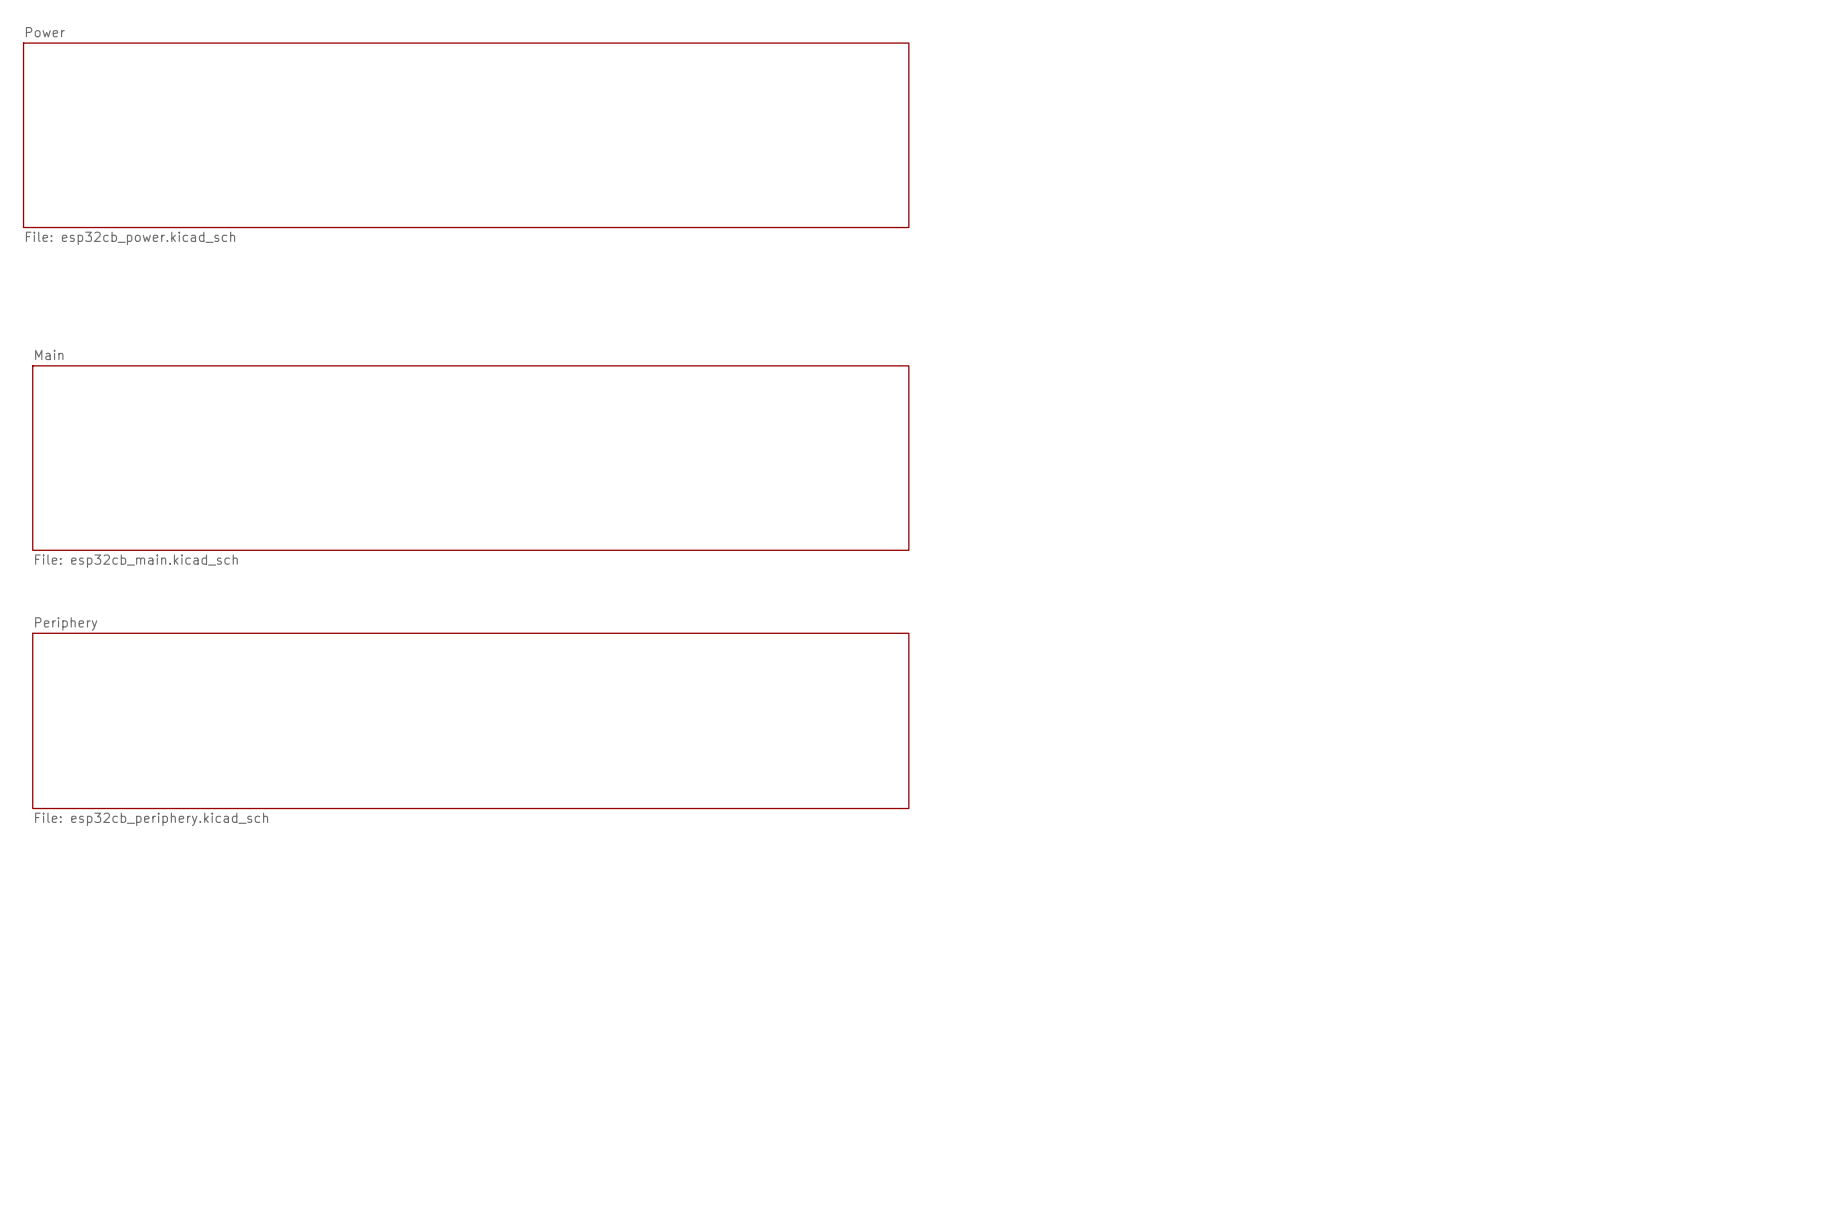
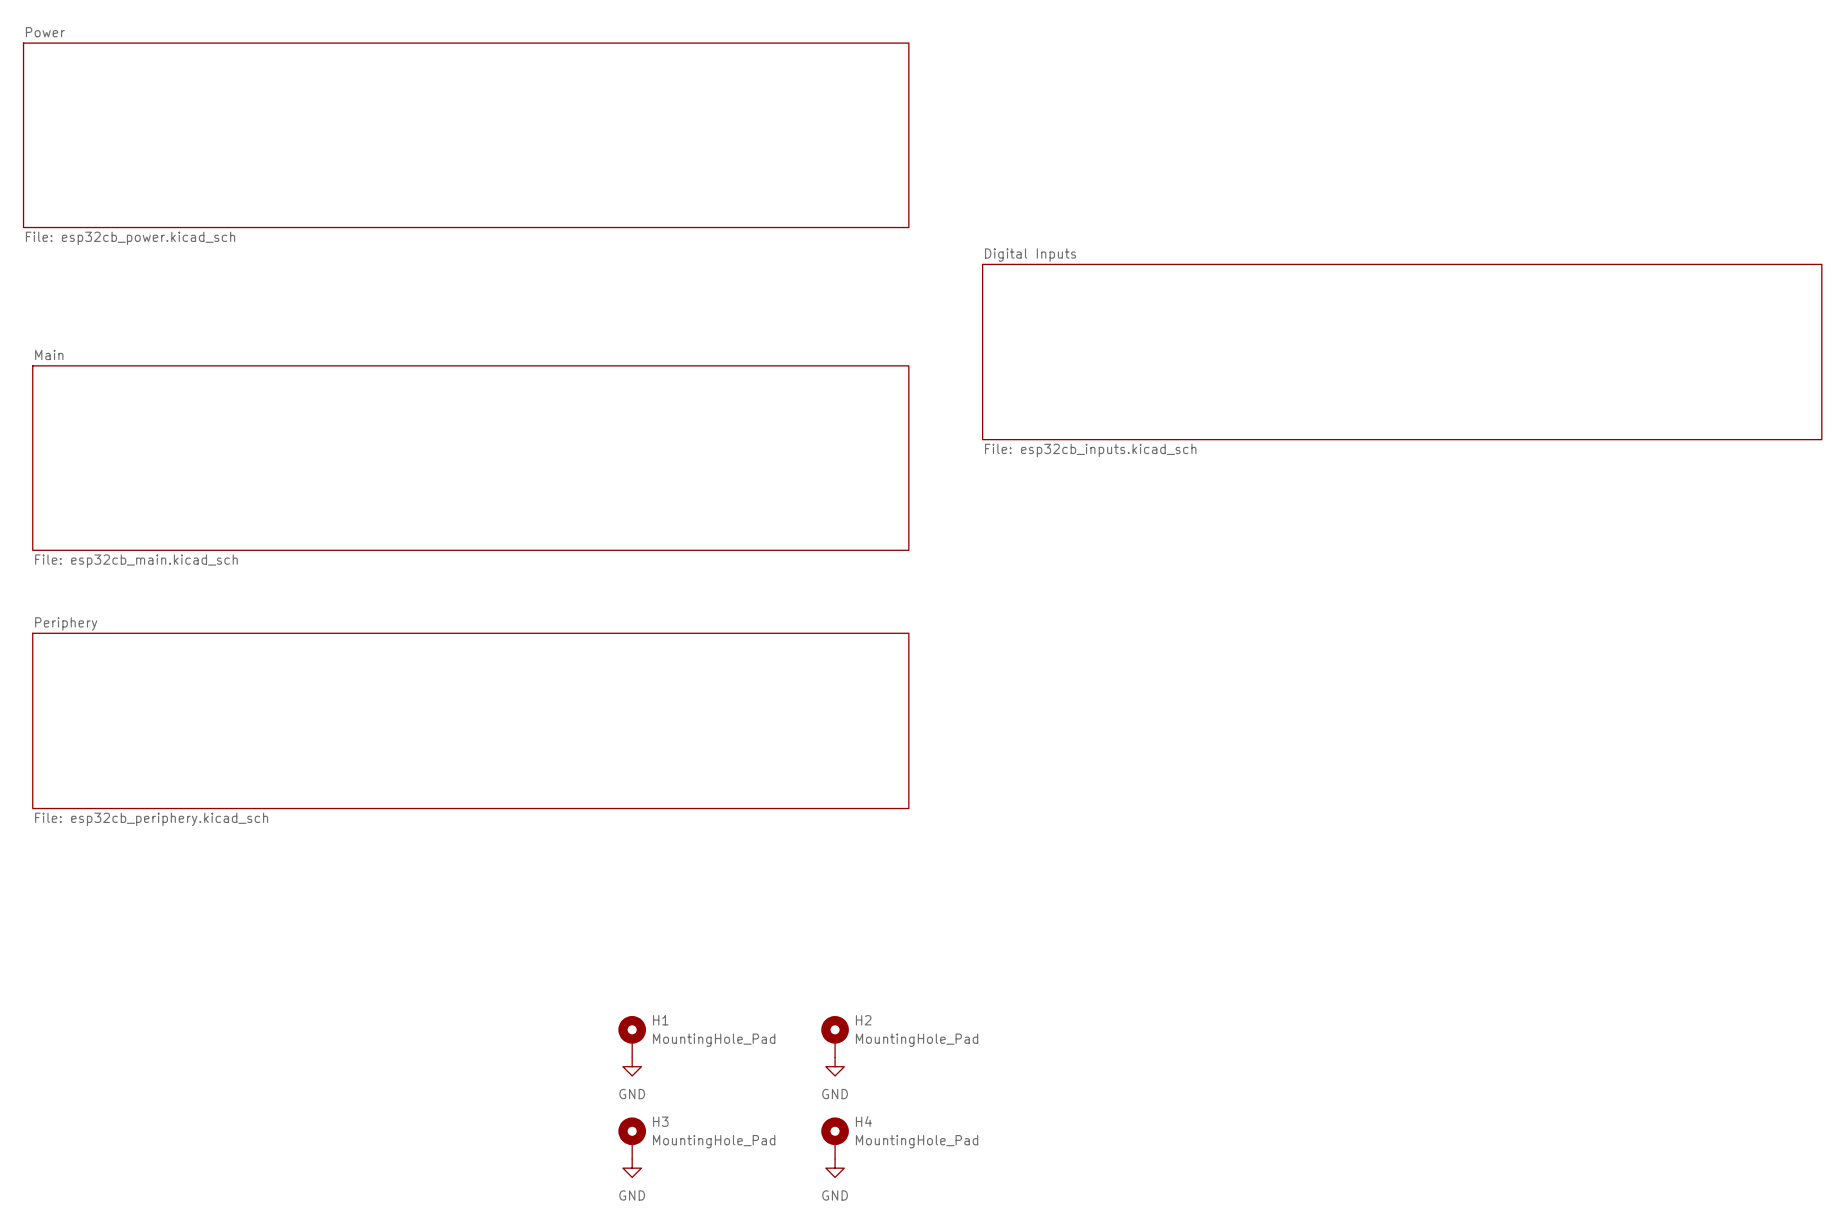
sheet Digital Inputs: none -> File: esp32cb_inputs.kicad_sch (1402, 352)
H1: none -> MountingHole_Pad (632, 1036)
H2: none -> MountingHole_Pad (835, 1036)
power symbol: none -> GND (632, 1066)
power symbol: none -> GND (835, 1066)
H3: none -> MountingHole_Pad (632, 1138)
H4: none -> MountingHole_Pad (835, 1138)
power symbol: none -> GND (632, 1168)
power symbol: none -> GND (835, 1168)

